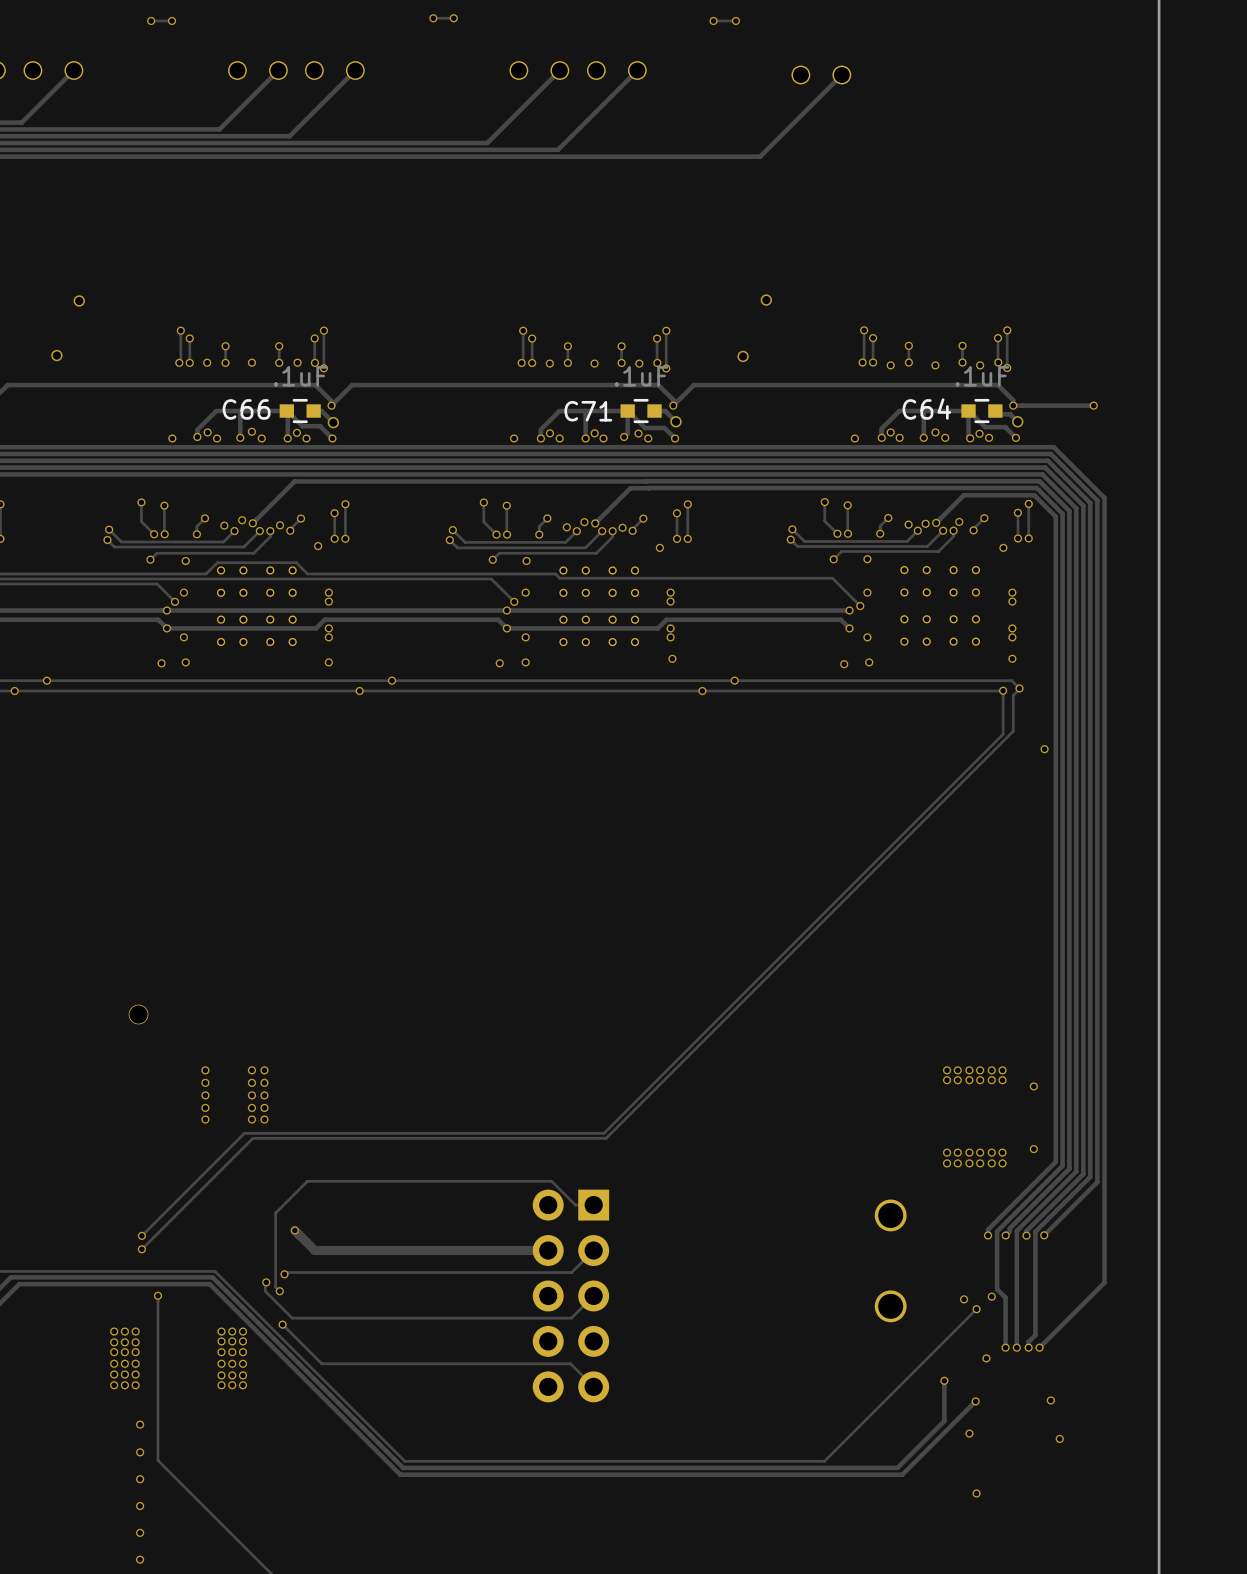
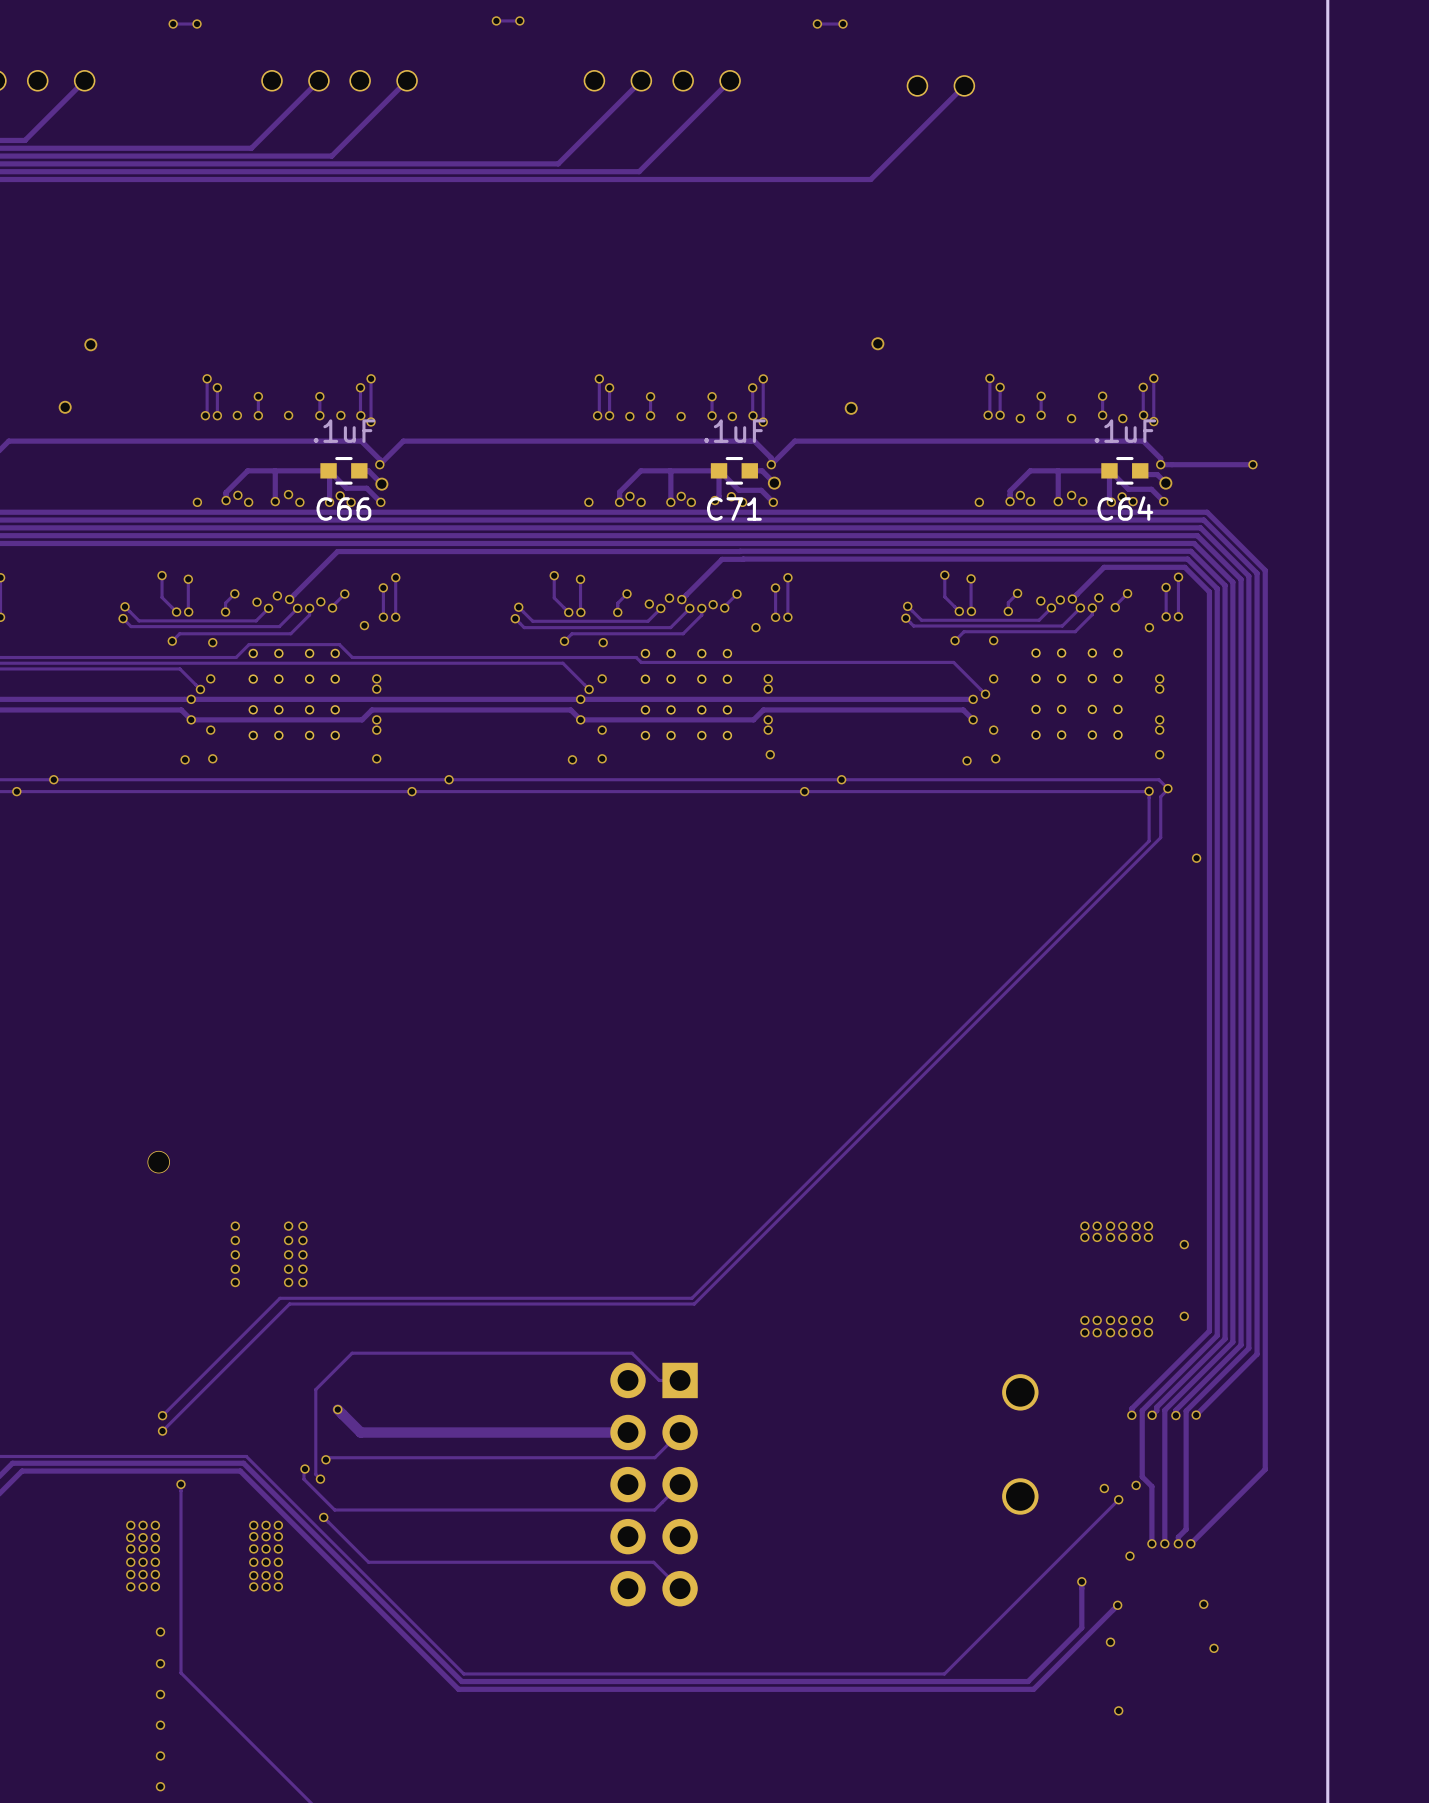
C66 name position: C66 (246, 409) -> C66 (343, 509)
C64 name position: C64 (926, 409) -> C64 (1125, 508)
C71 name position: C71 (588, 411) -> C71 (734, 509)

